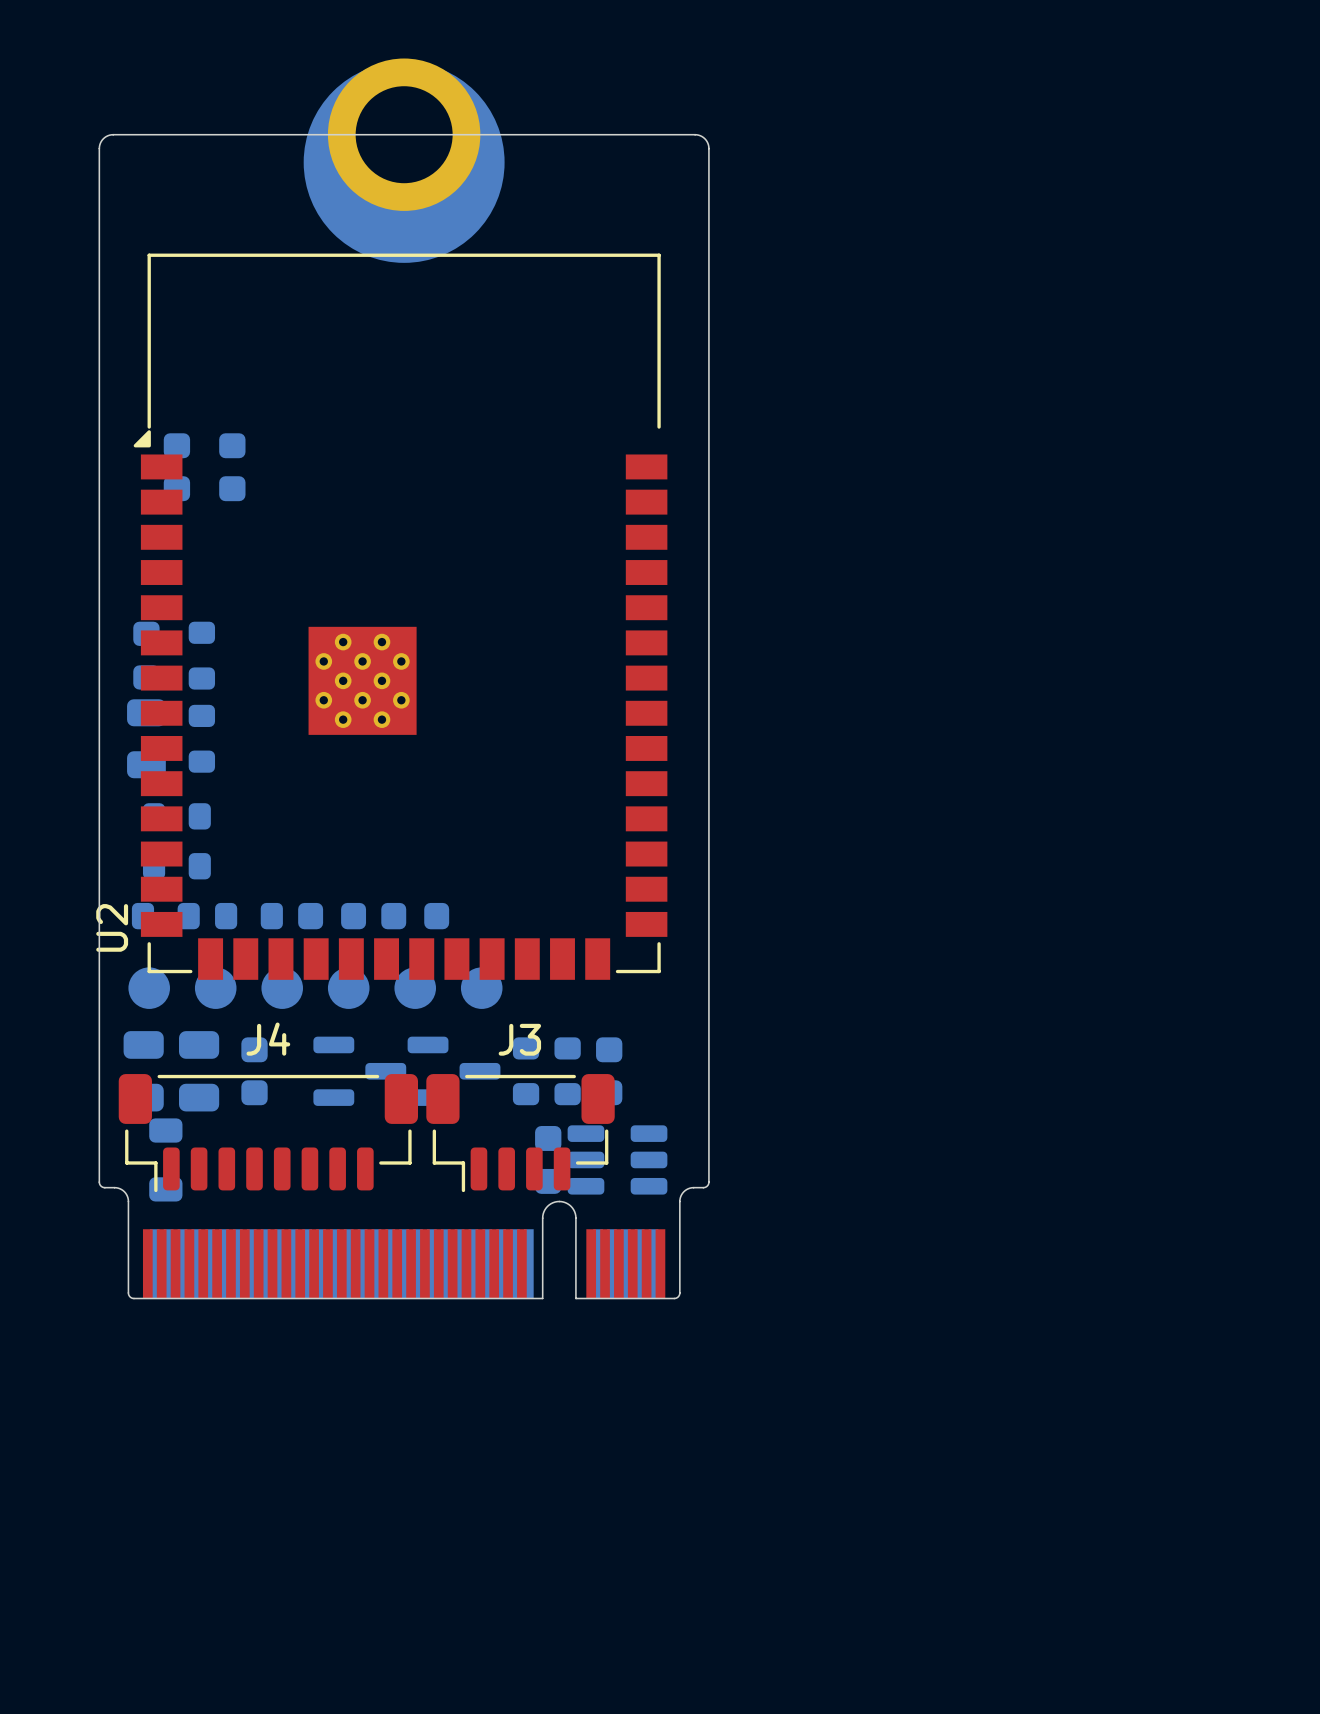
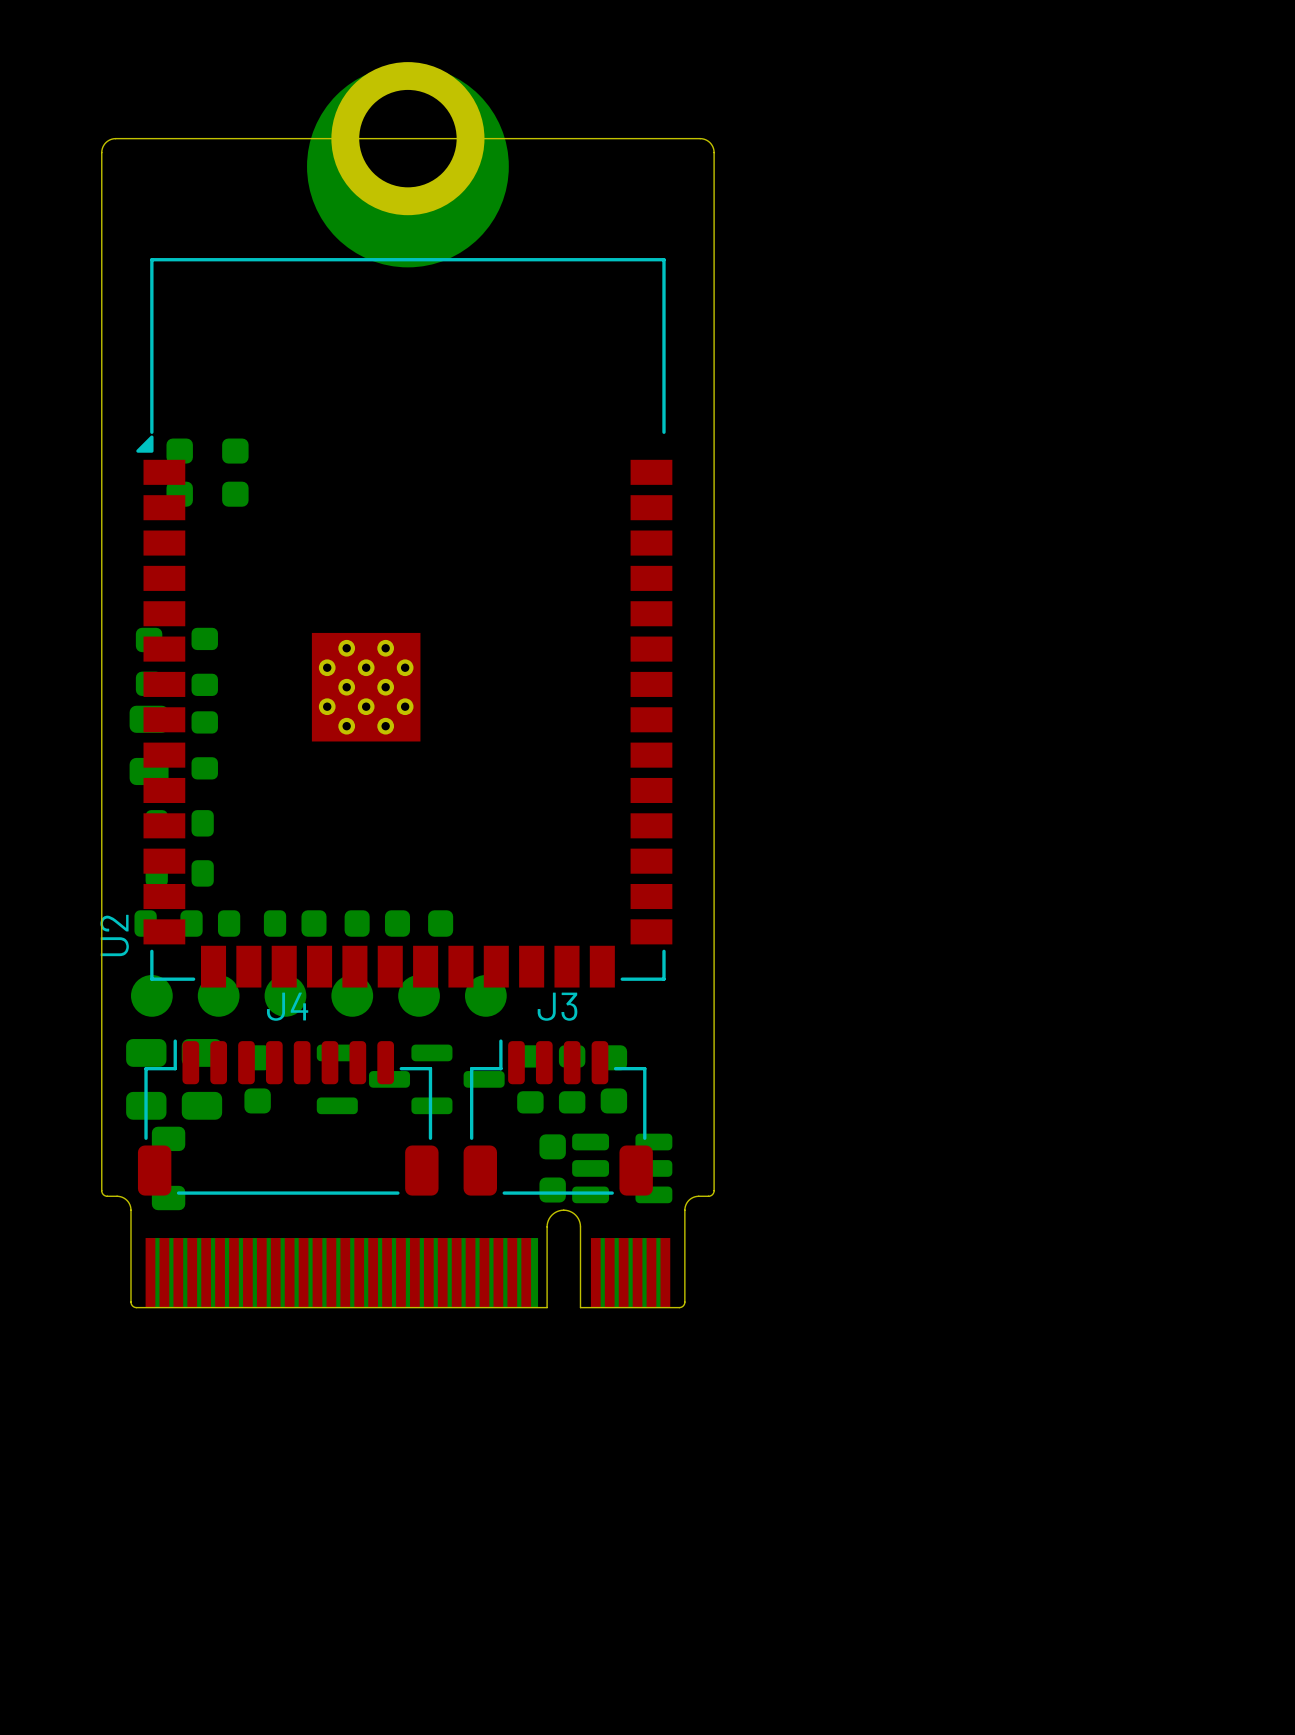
J4 footprint: [118, 1074, 418, 1193] -> [137, 1039, 439, 1196]
J3 footprint: [426, 1074, 615, 1193] -> [463, 1039, 653, 1196]

